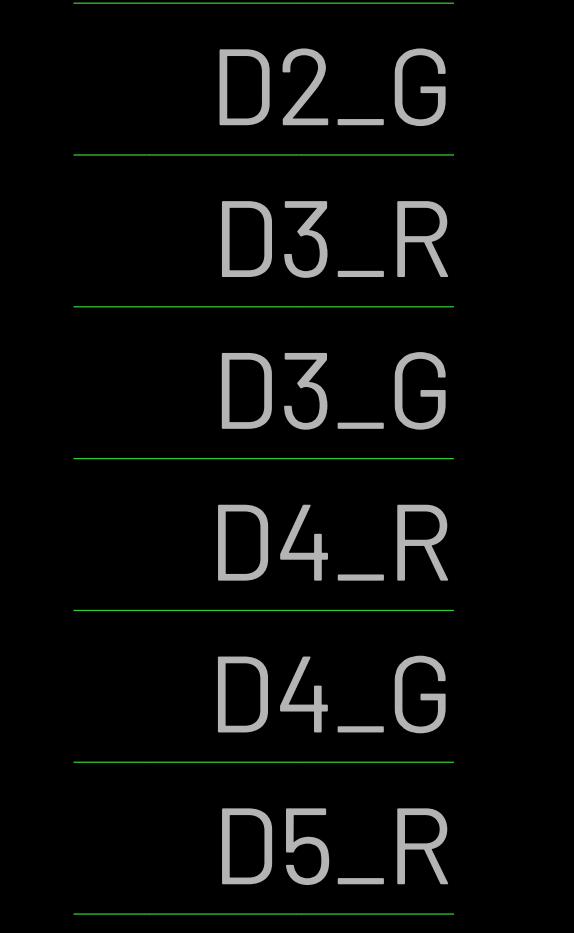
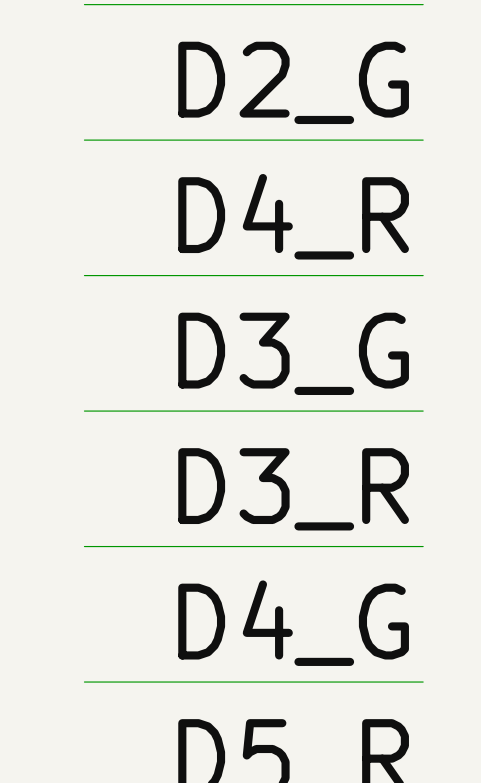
label: D3_R (335, 239) -> D4_R (293, 216)
label: D4_R (333, 542) -> D3_R (293, 489)

